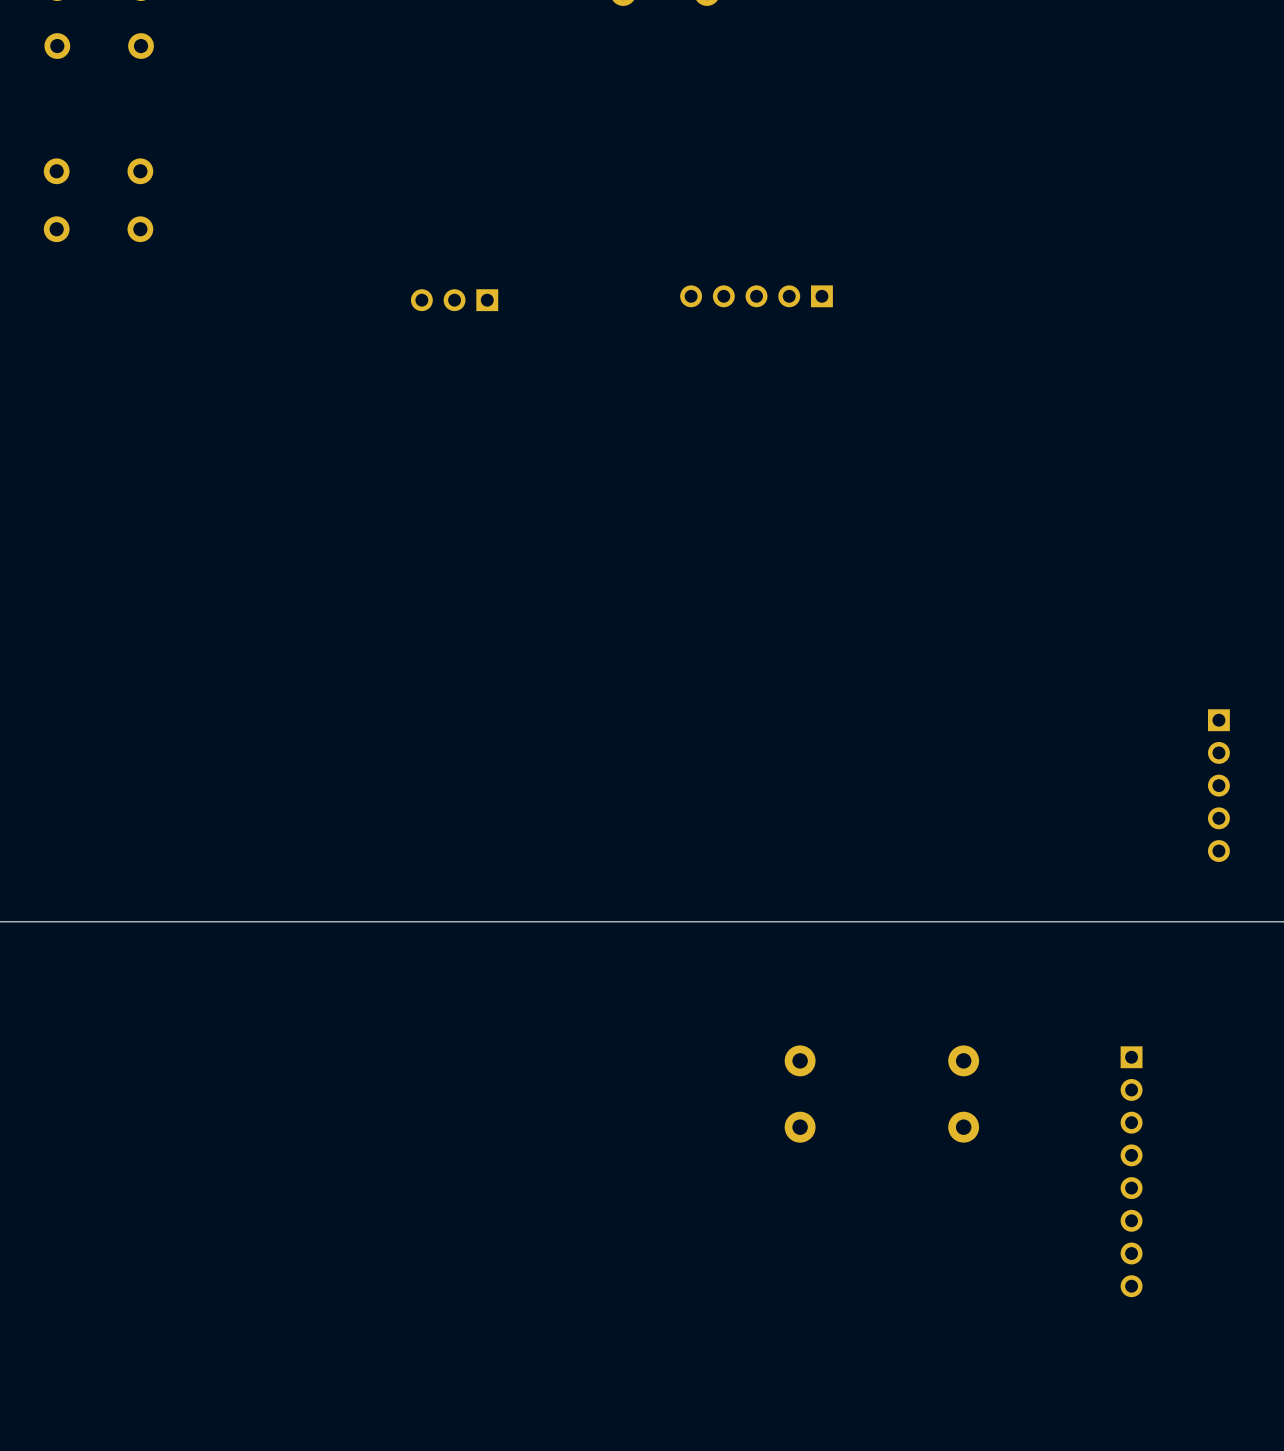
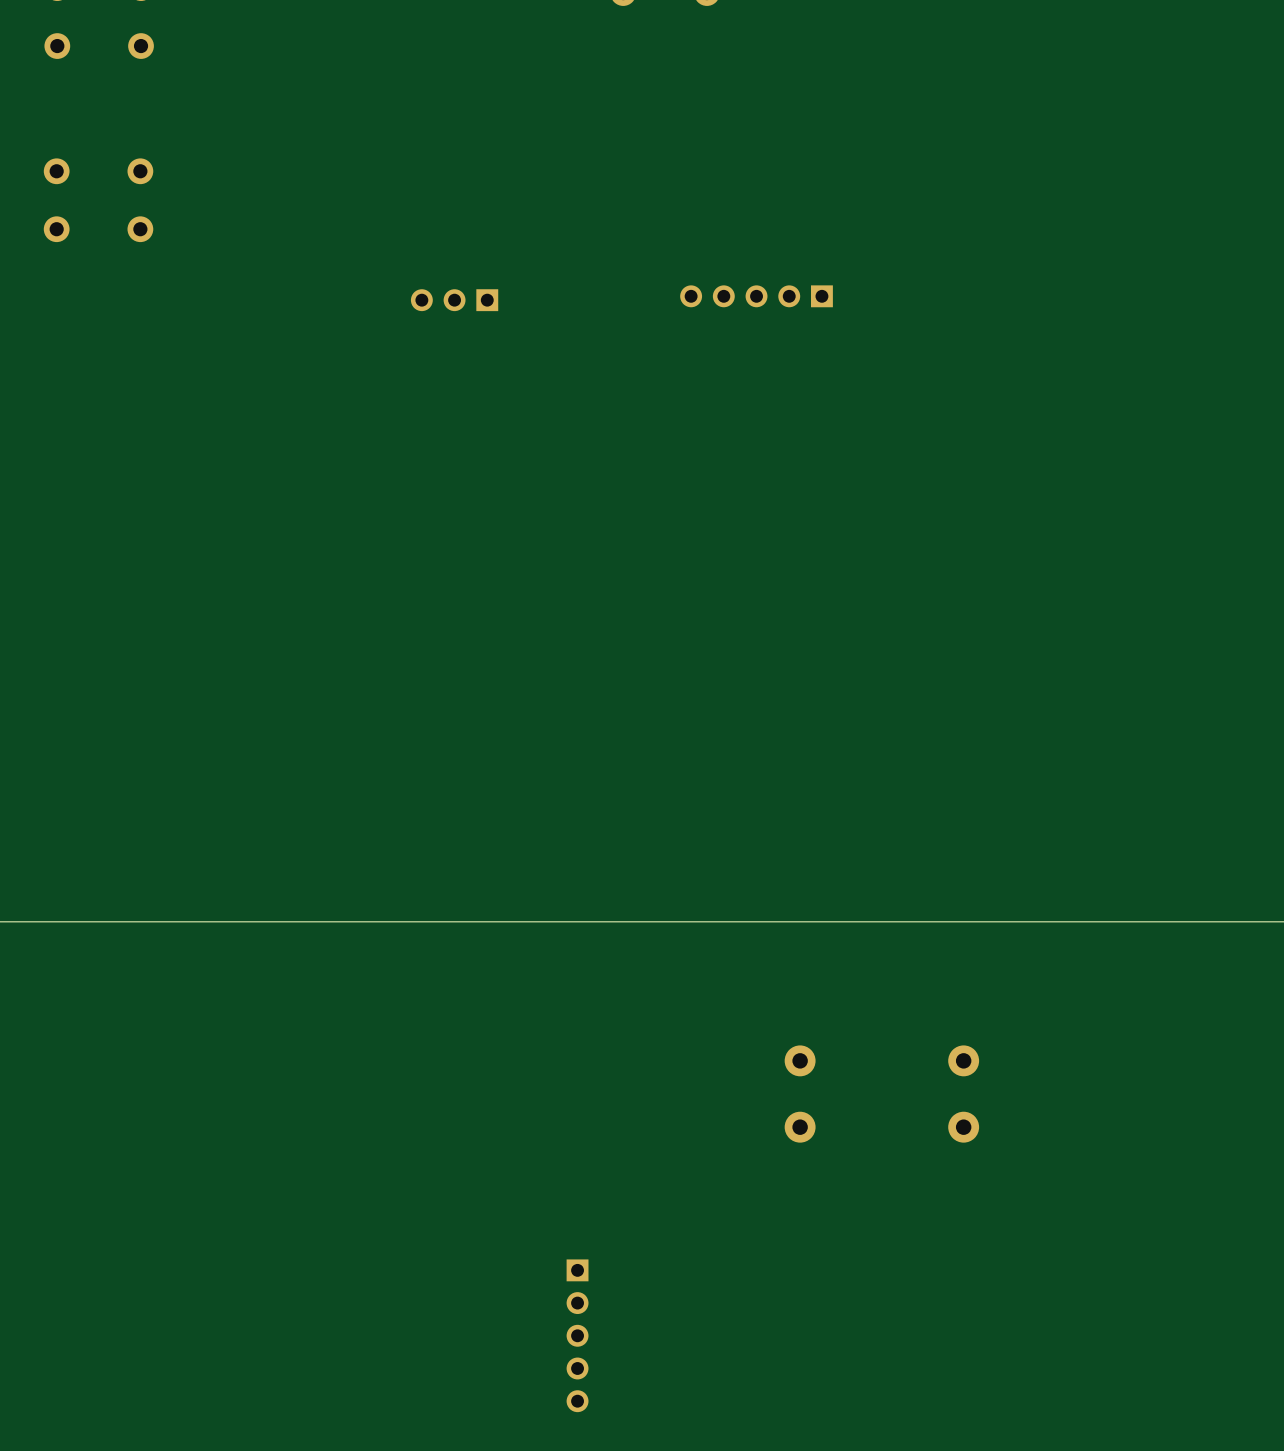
part: (1218, 785) -> none
part: (1131, 1171) -> none
part: none -> (577, 1335)

